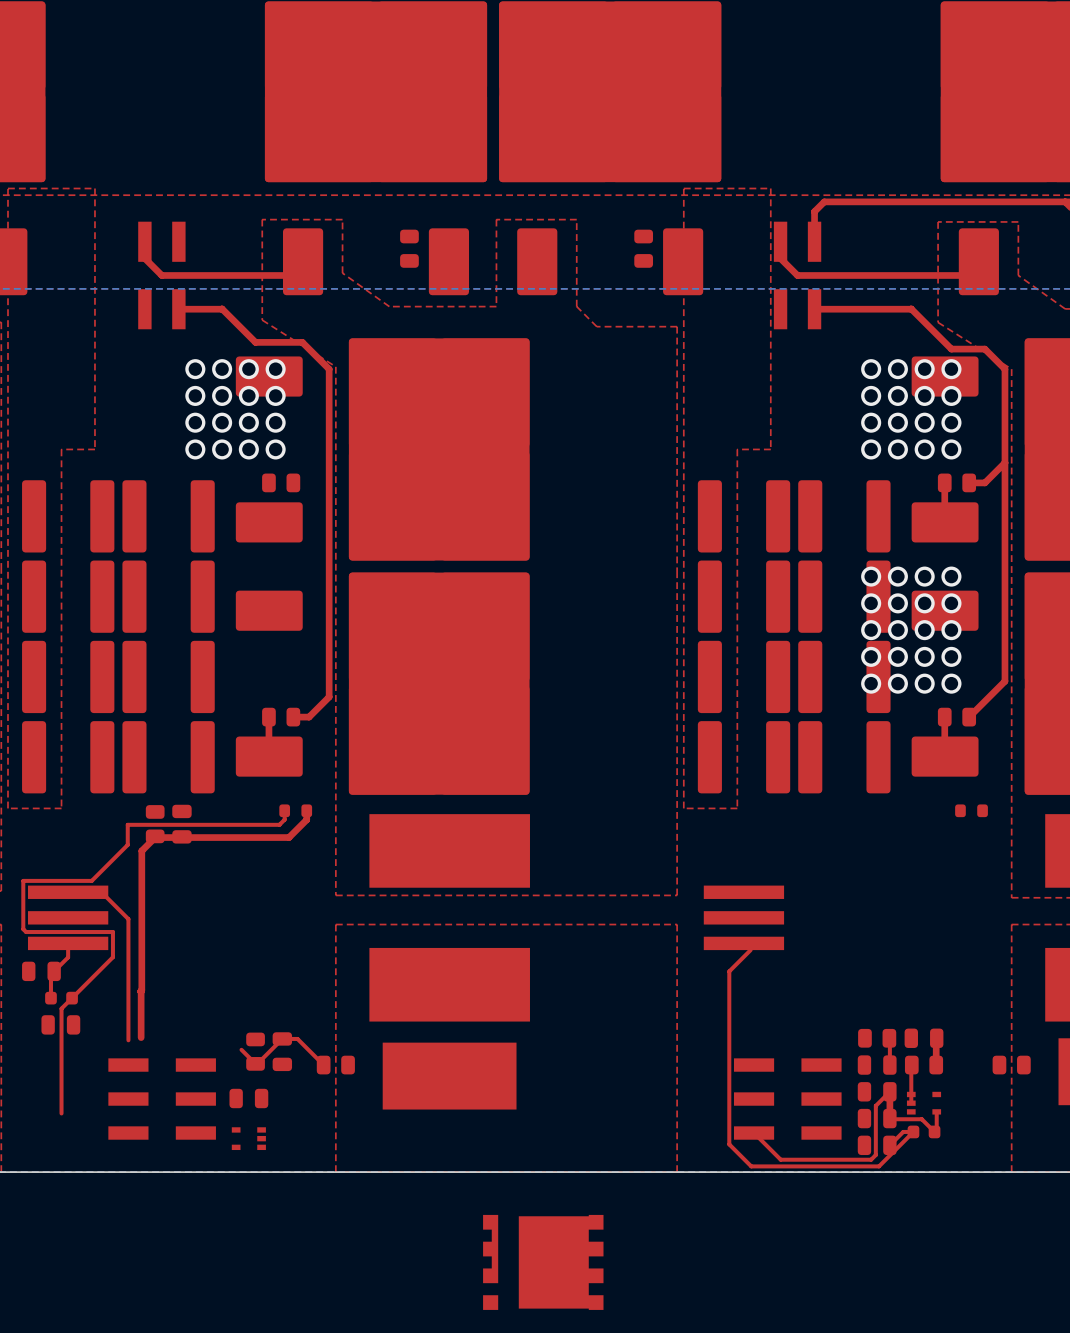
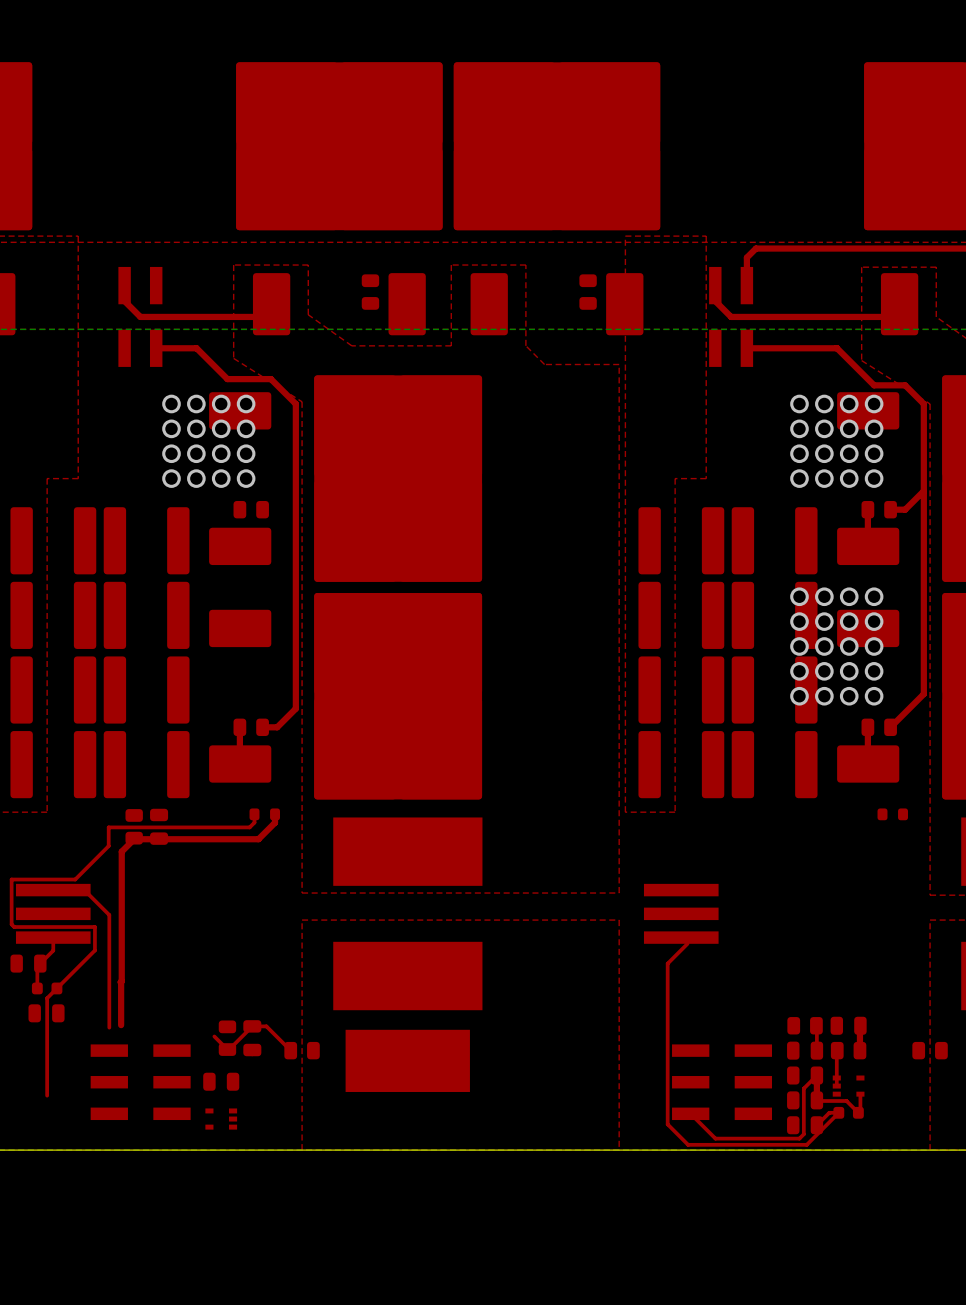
part: (543, 1262) -> none

